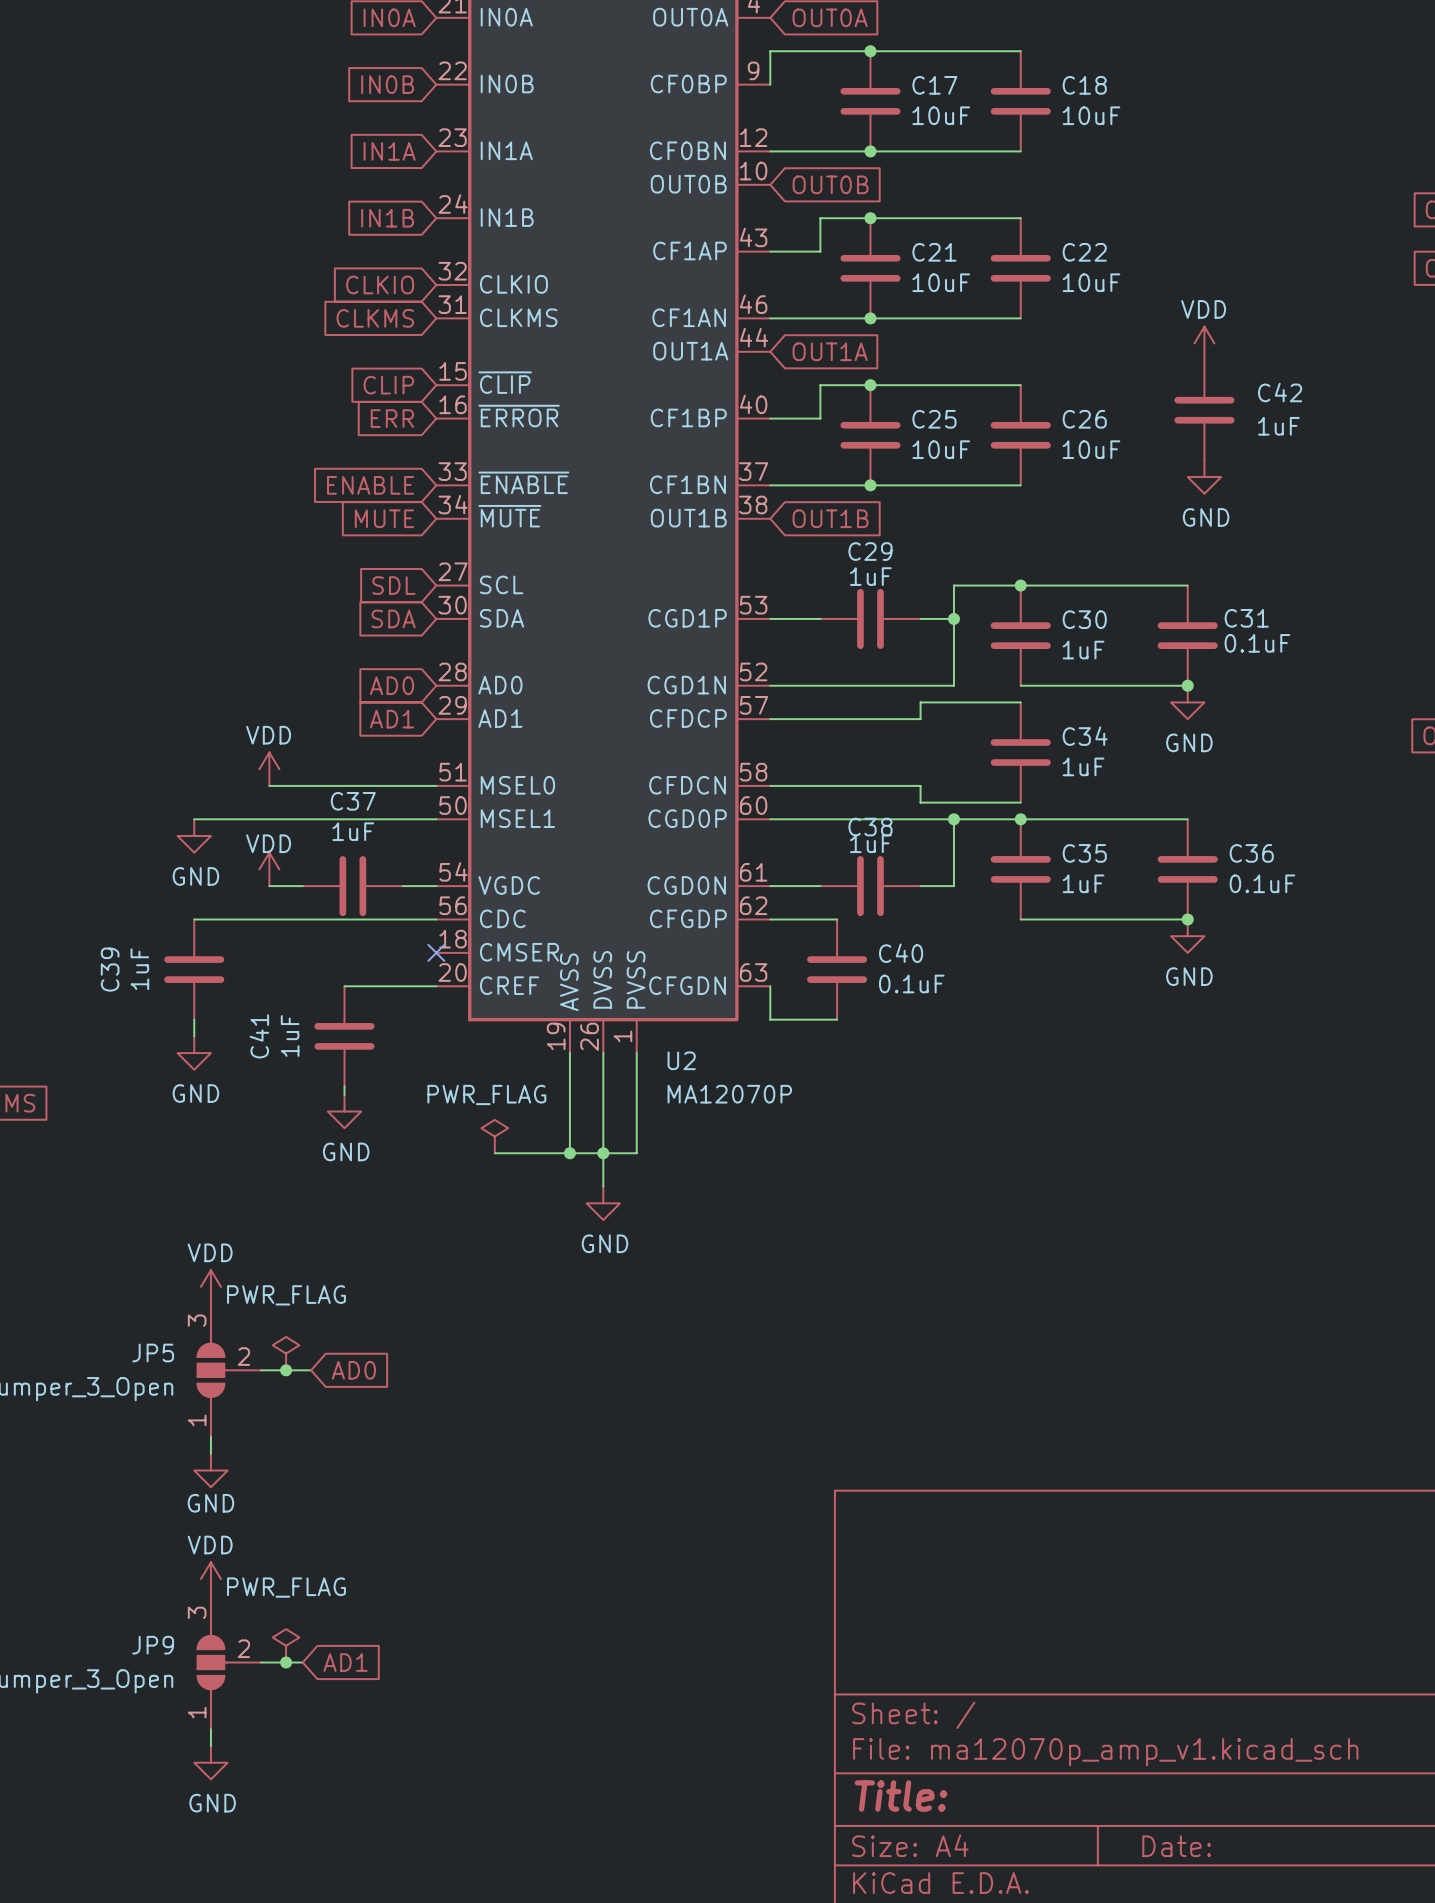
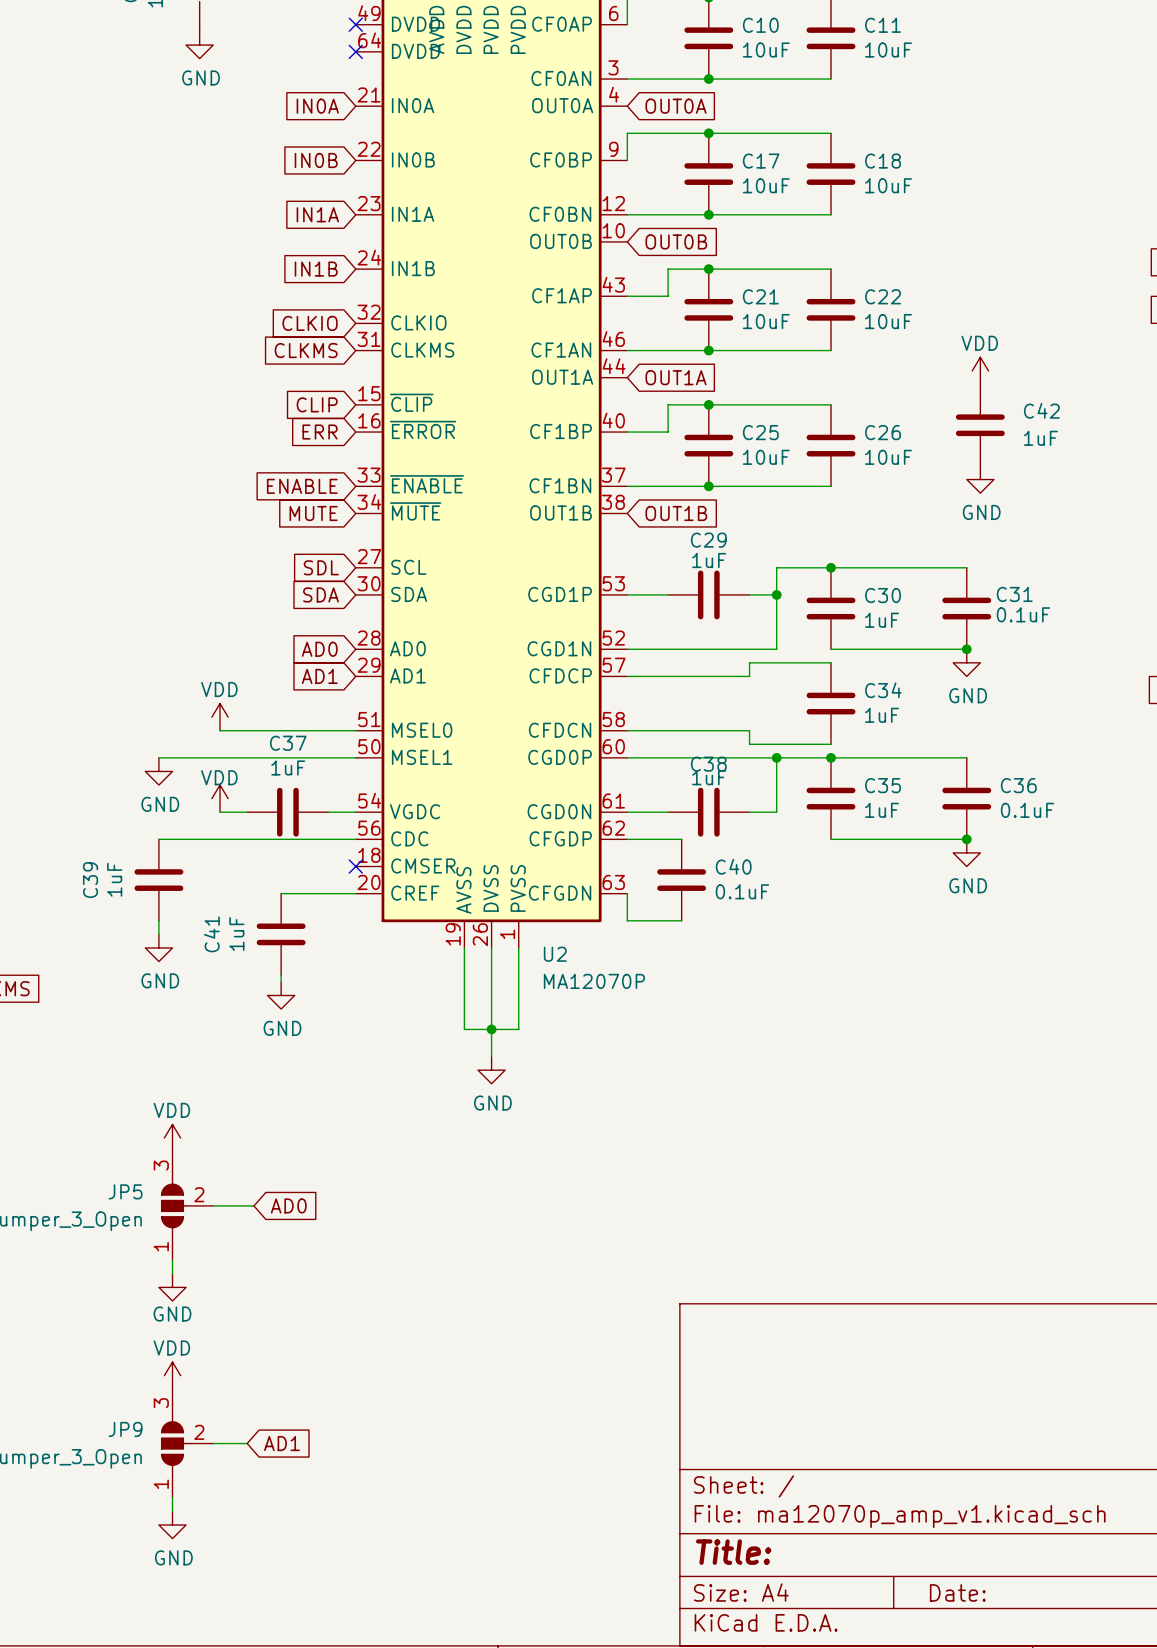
power symbol: PWR_FLAG (494, 1136) -> none
wire: (494, 1153) (569, 1153) -> none
junction: (569, 1153) -> none
power symbol: PWR_FLAG (286, 1353) -> none
junction: (286, 1370) -> none
power symbol: PWR_FLAG (286, 1645) -> none
junction: (286, 1662) -> none

